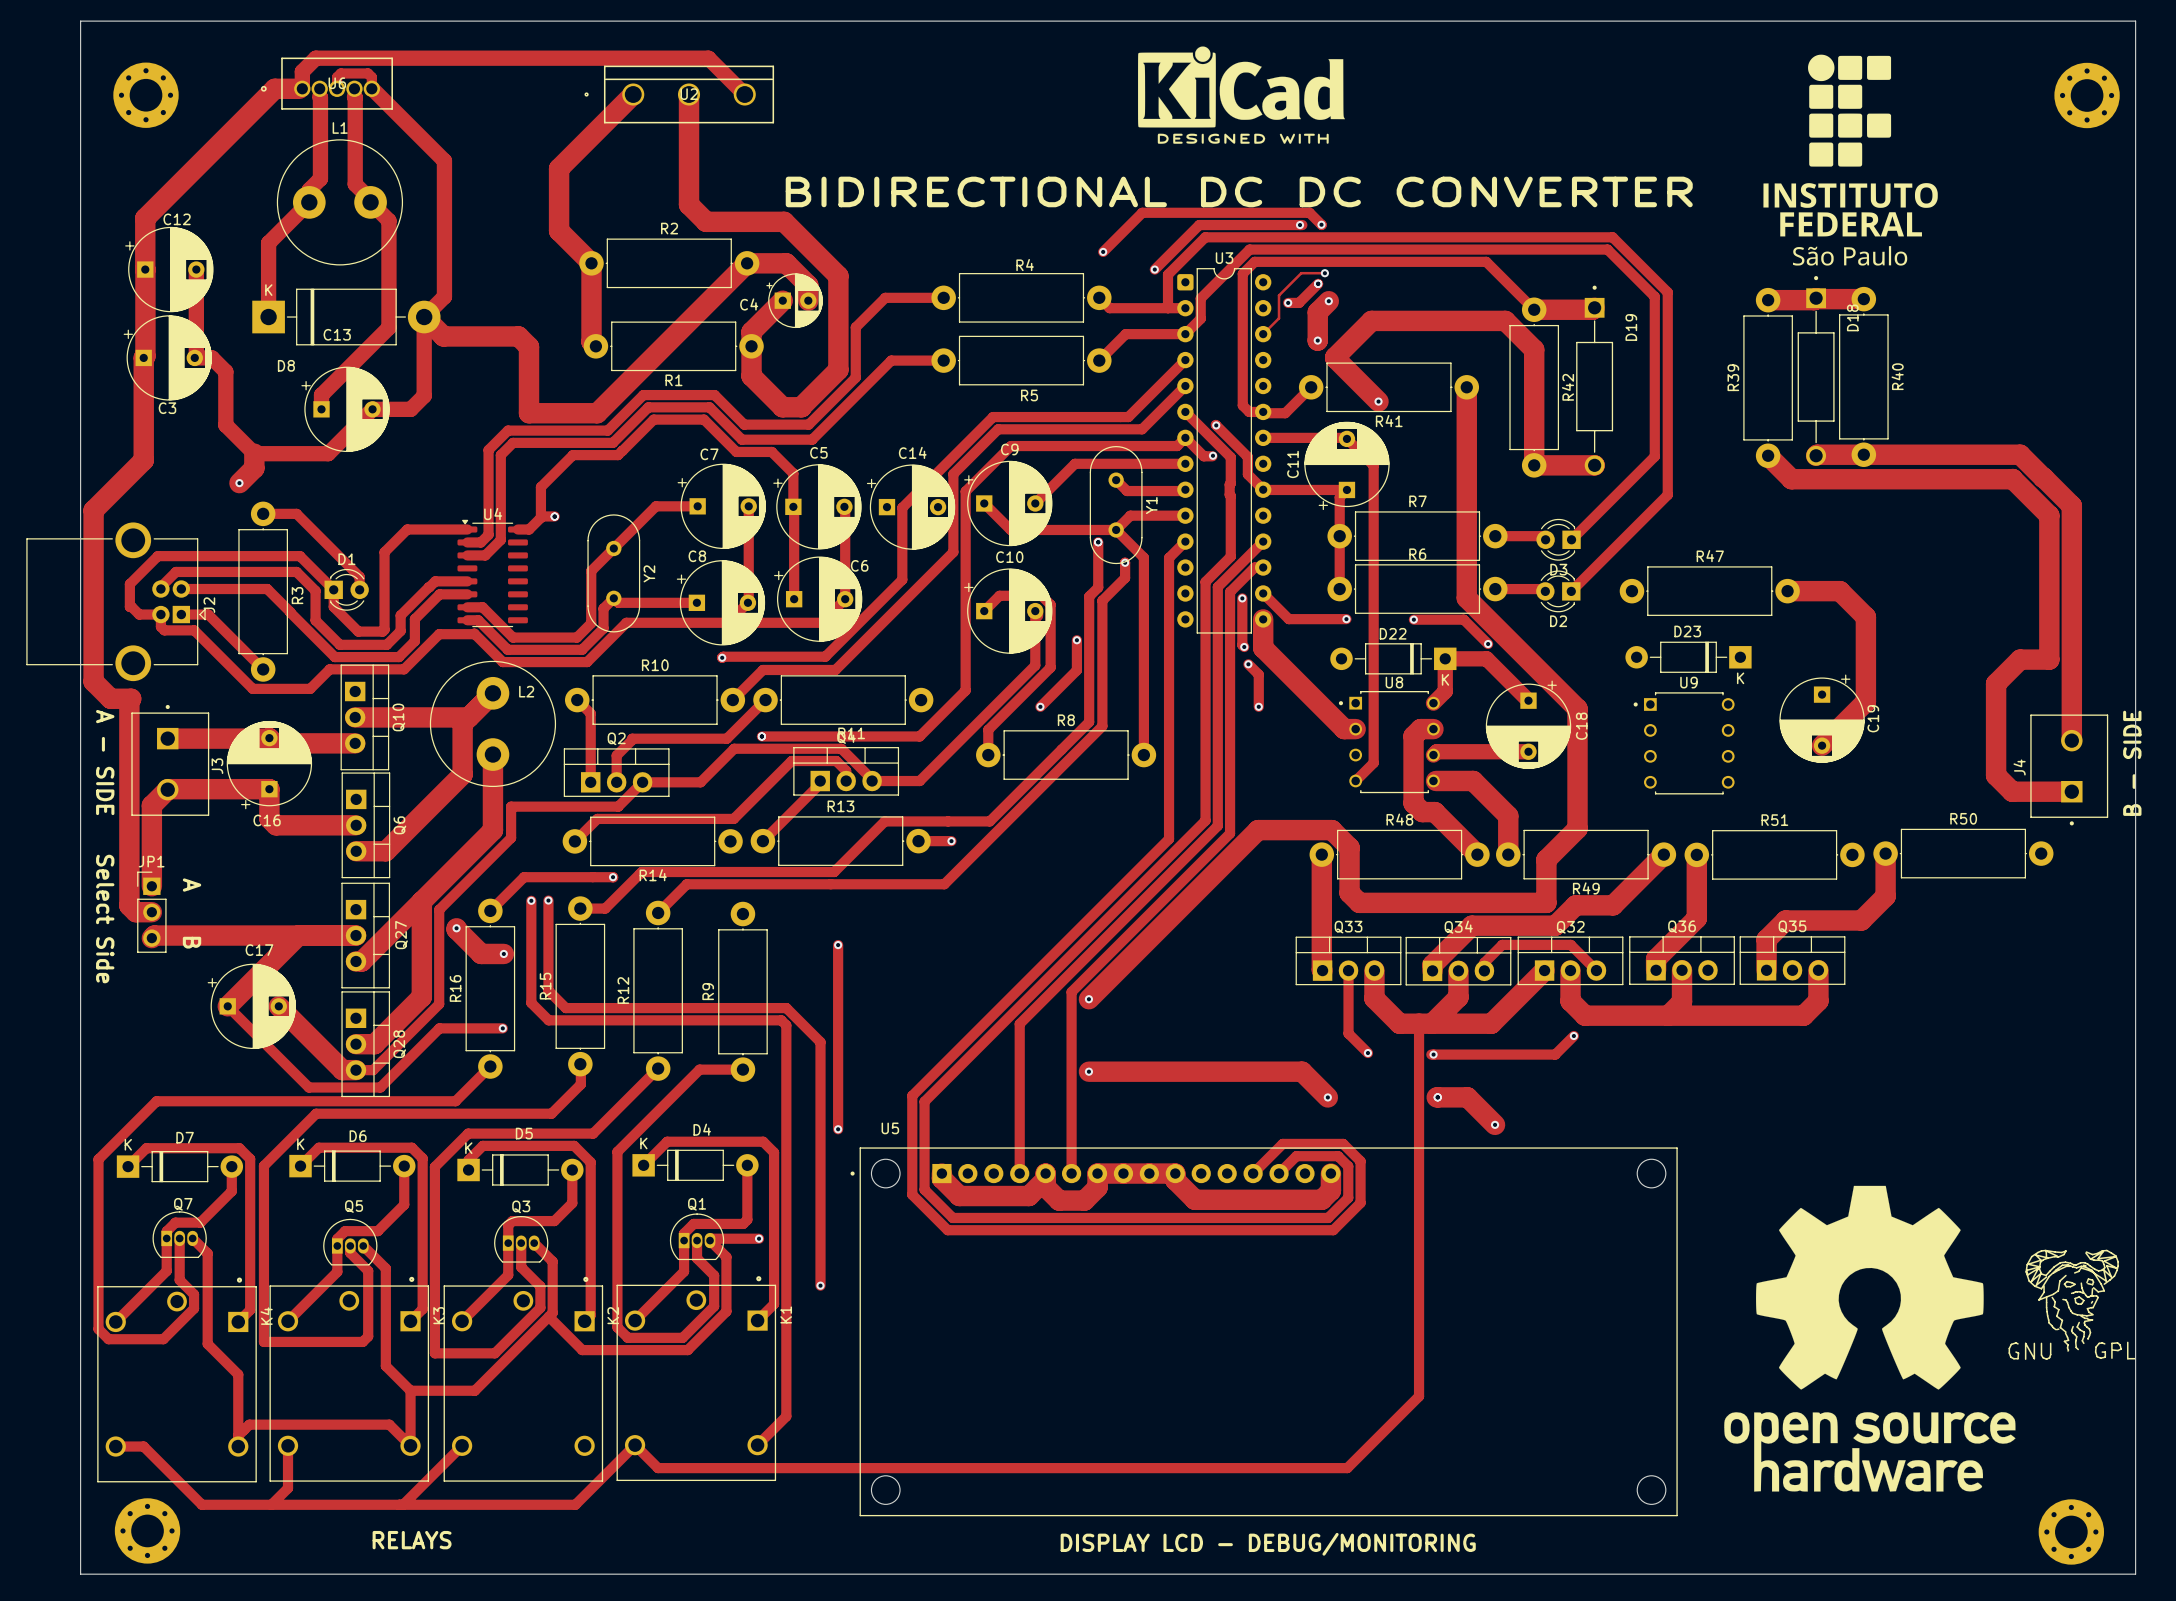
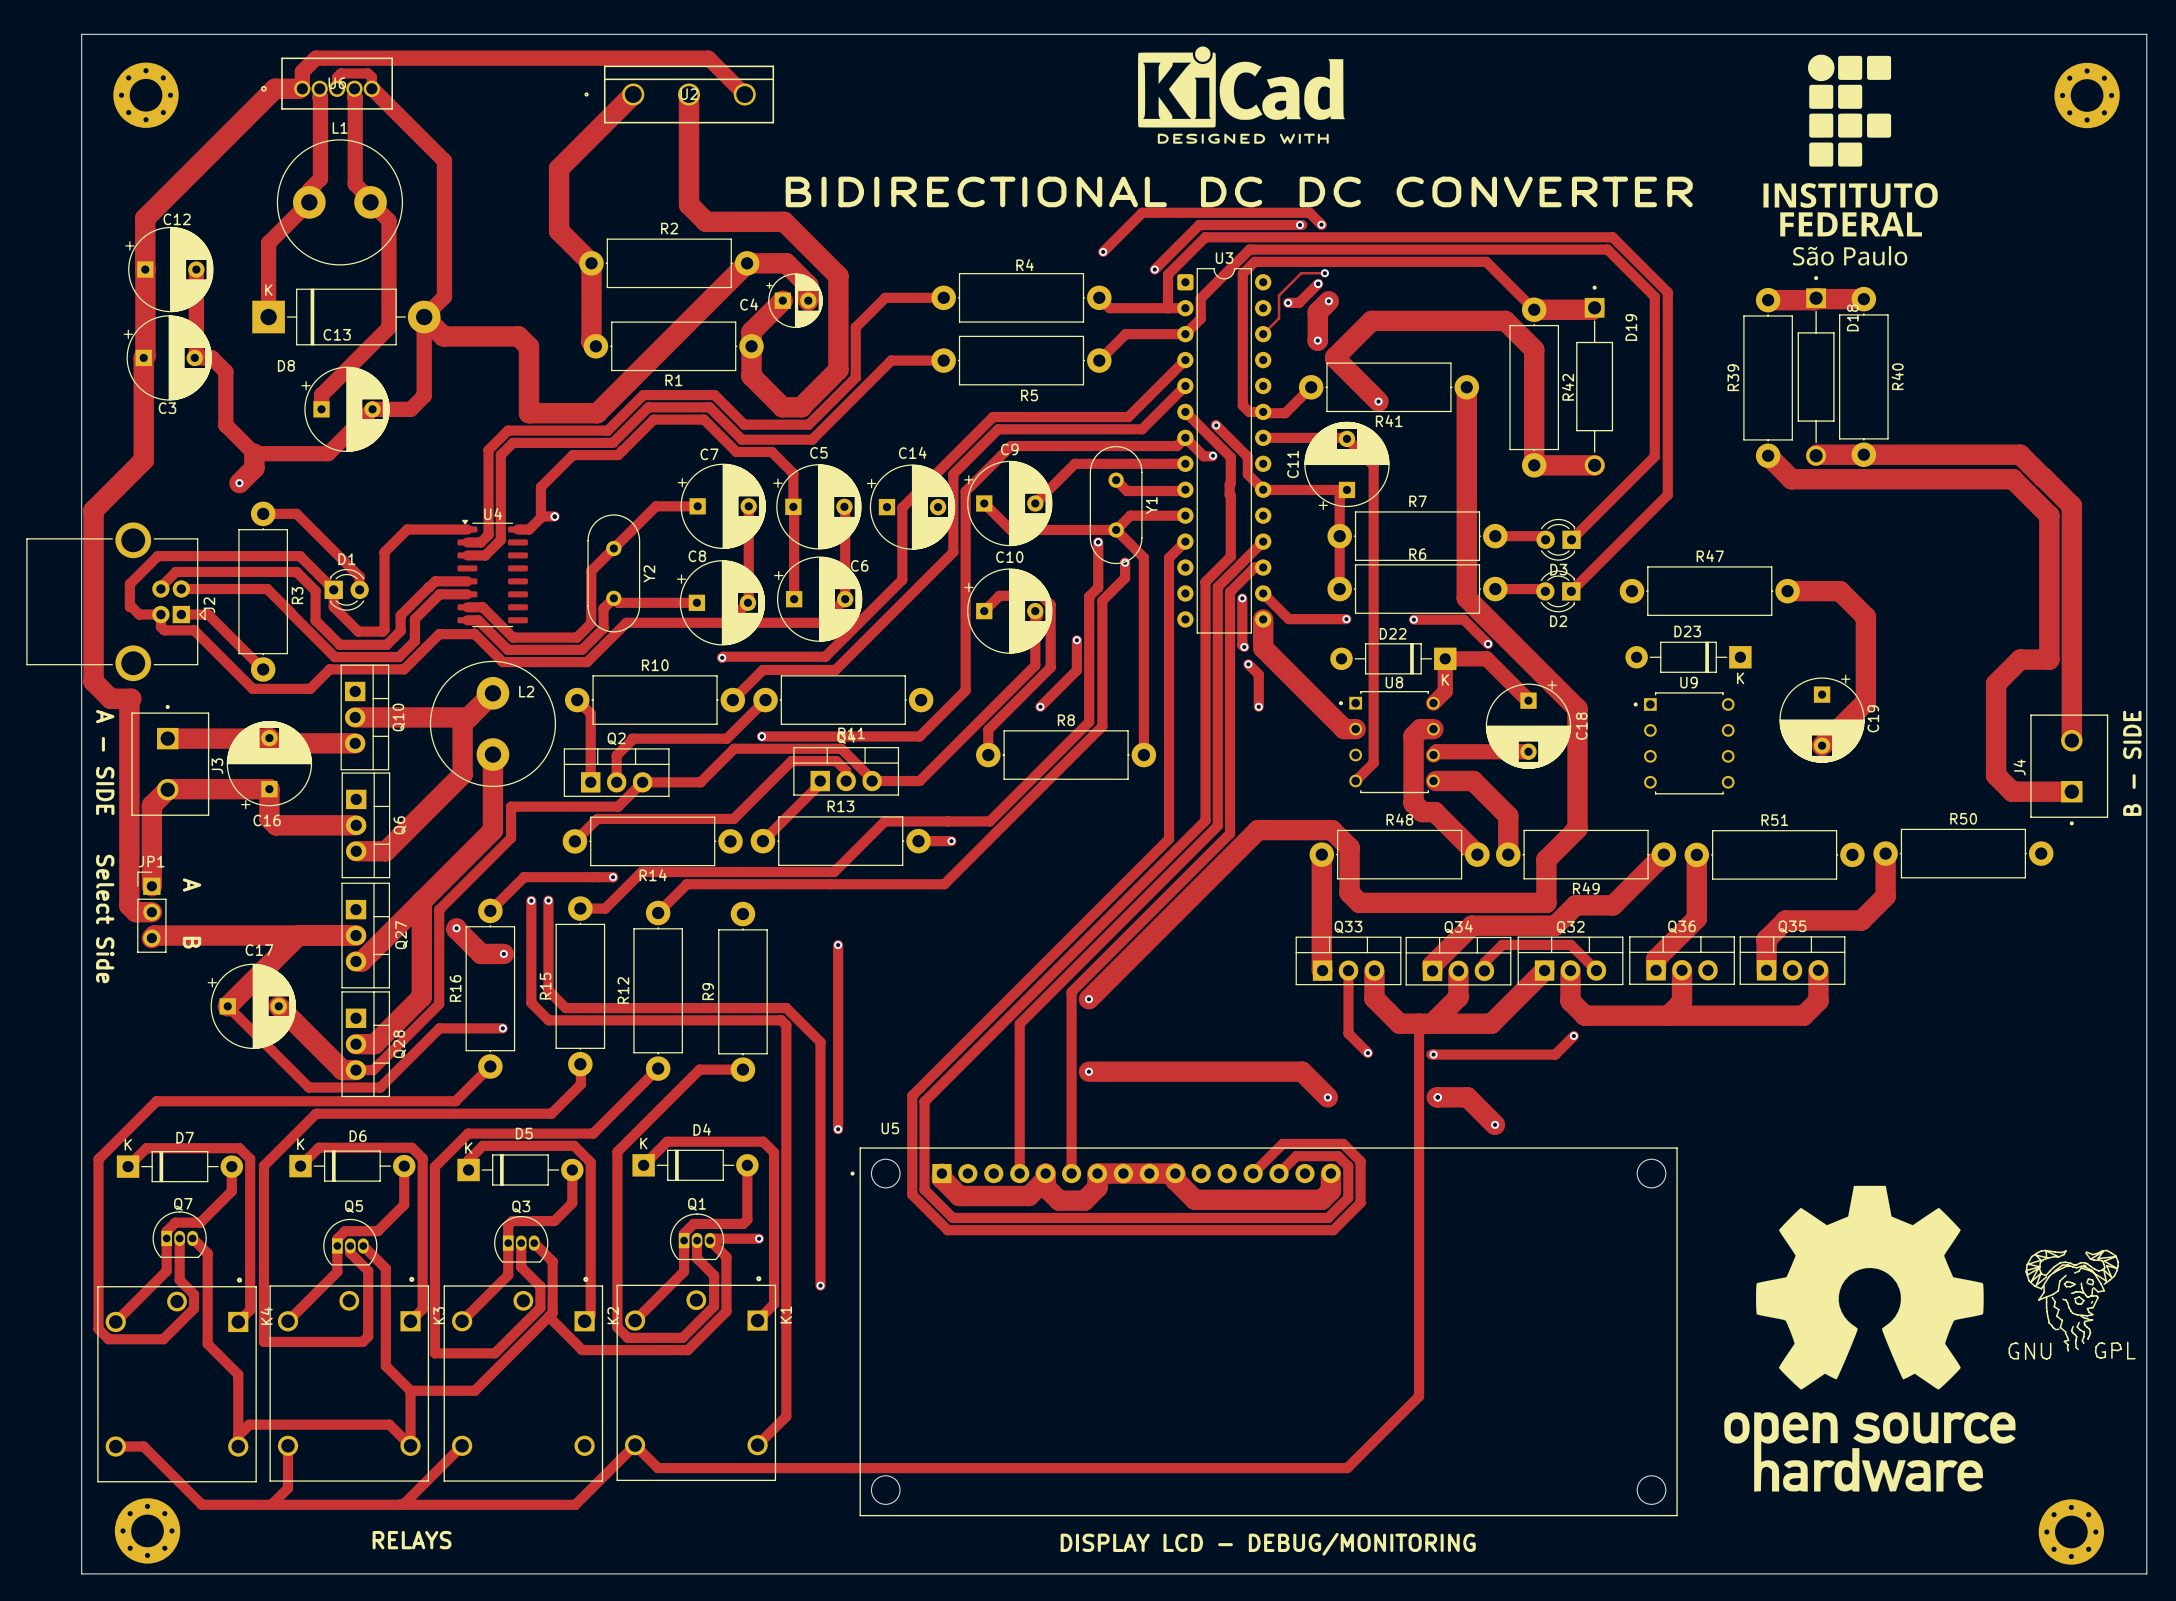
board edge: (80, 21) (2135, 21) (2135, 1574) (80, 1574) (80, 21) -> (81, 34) (81, 1573) (2146, 1573) (2146, 34) (81, 34)

